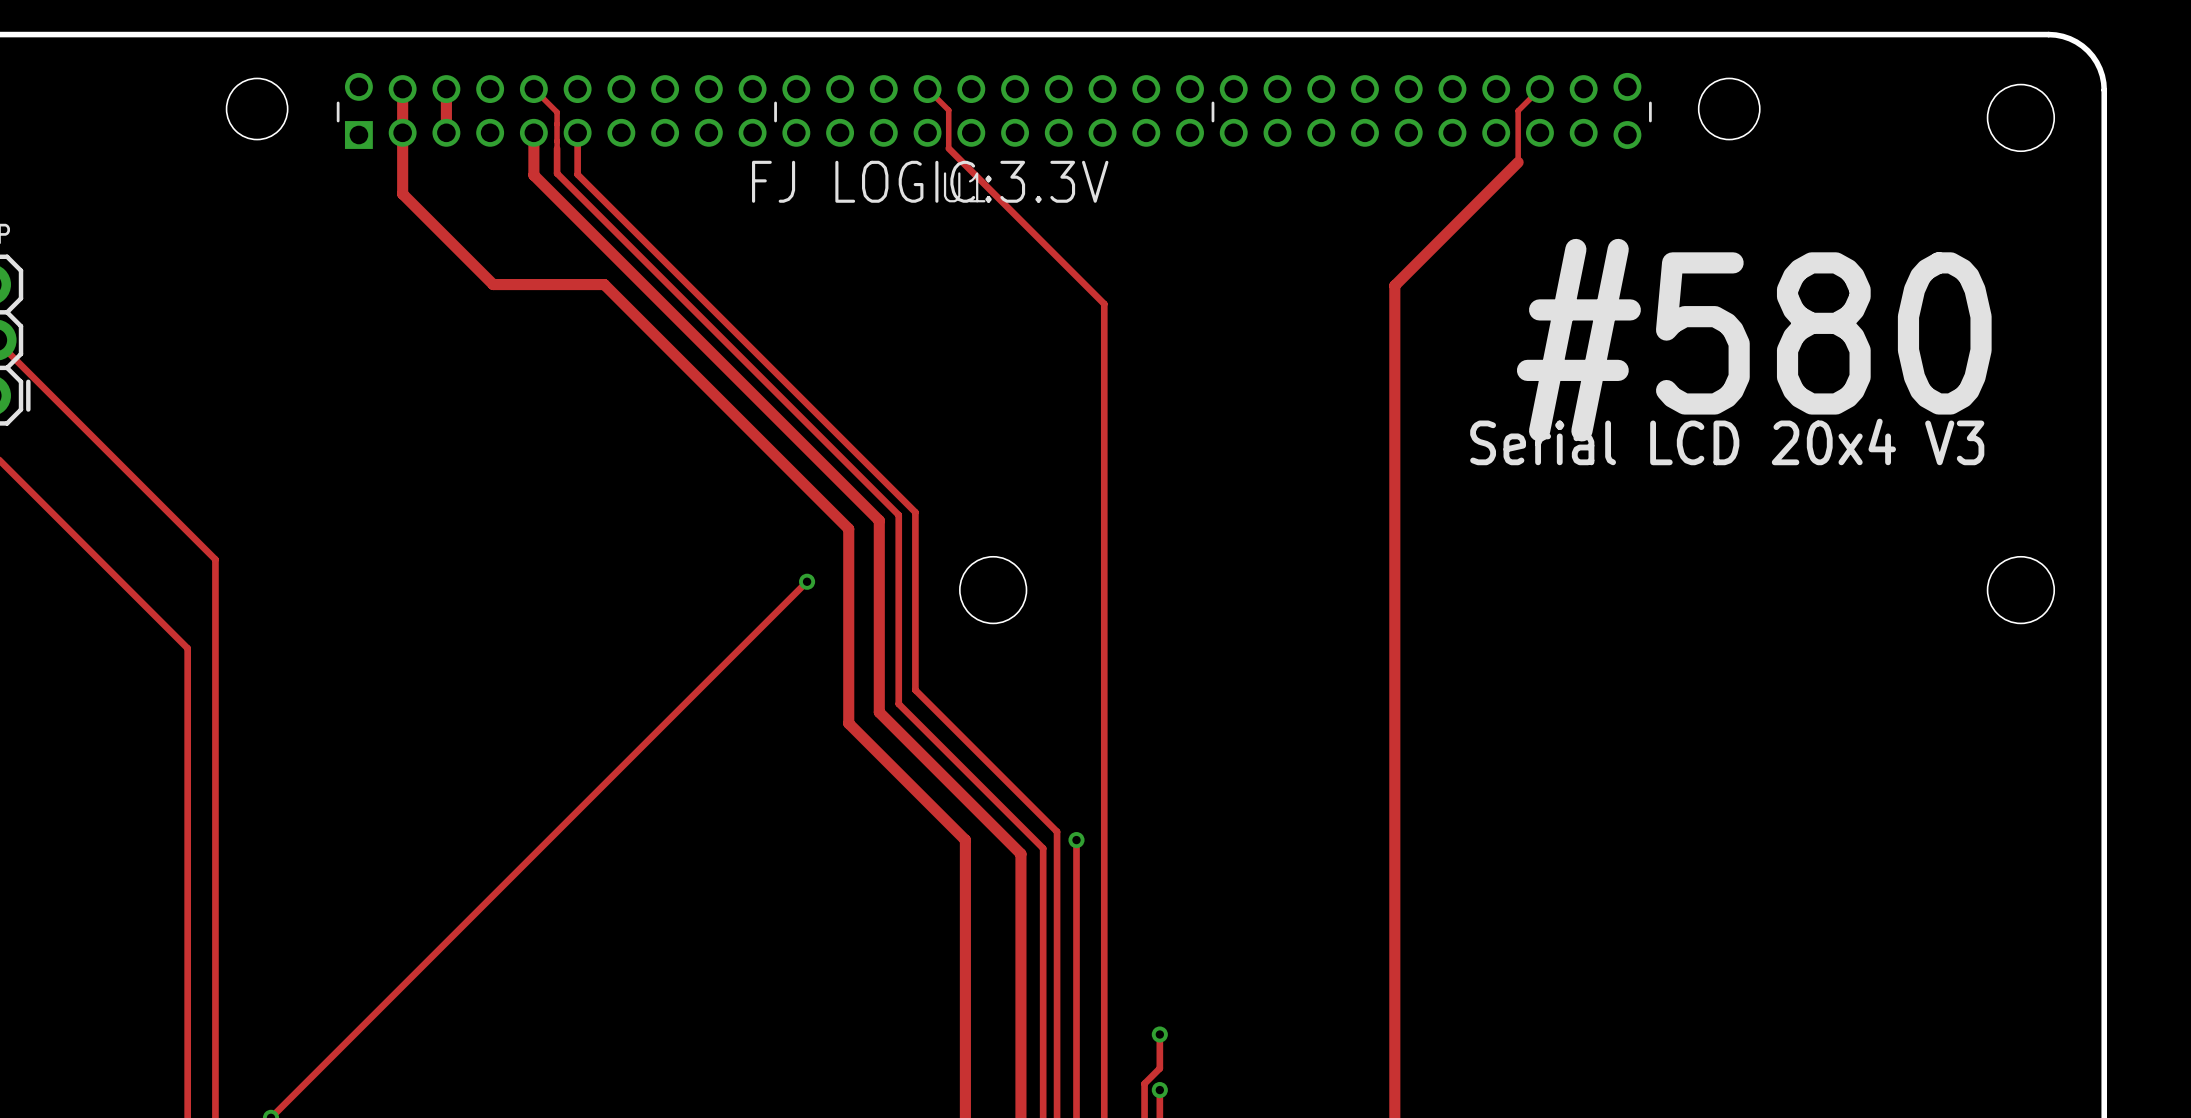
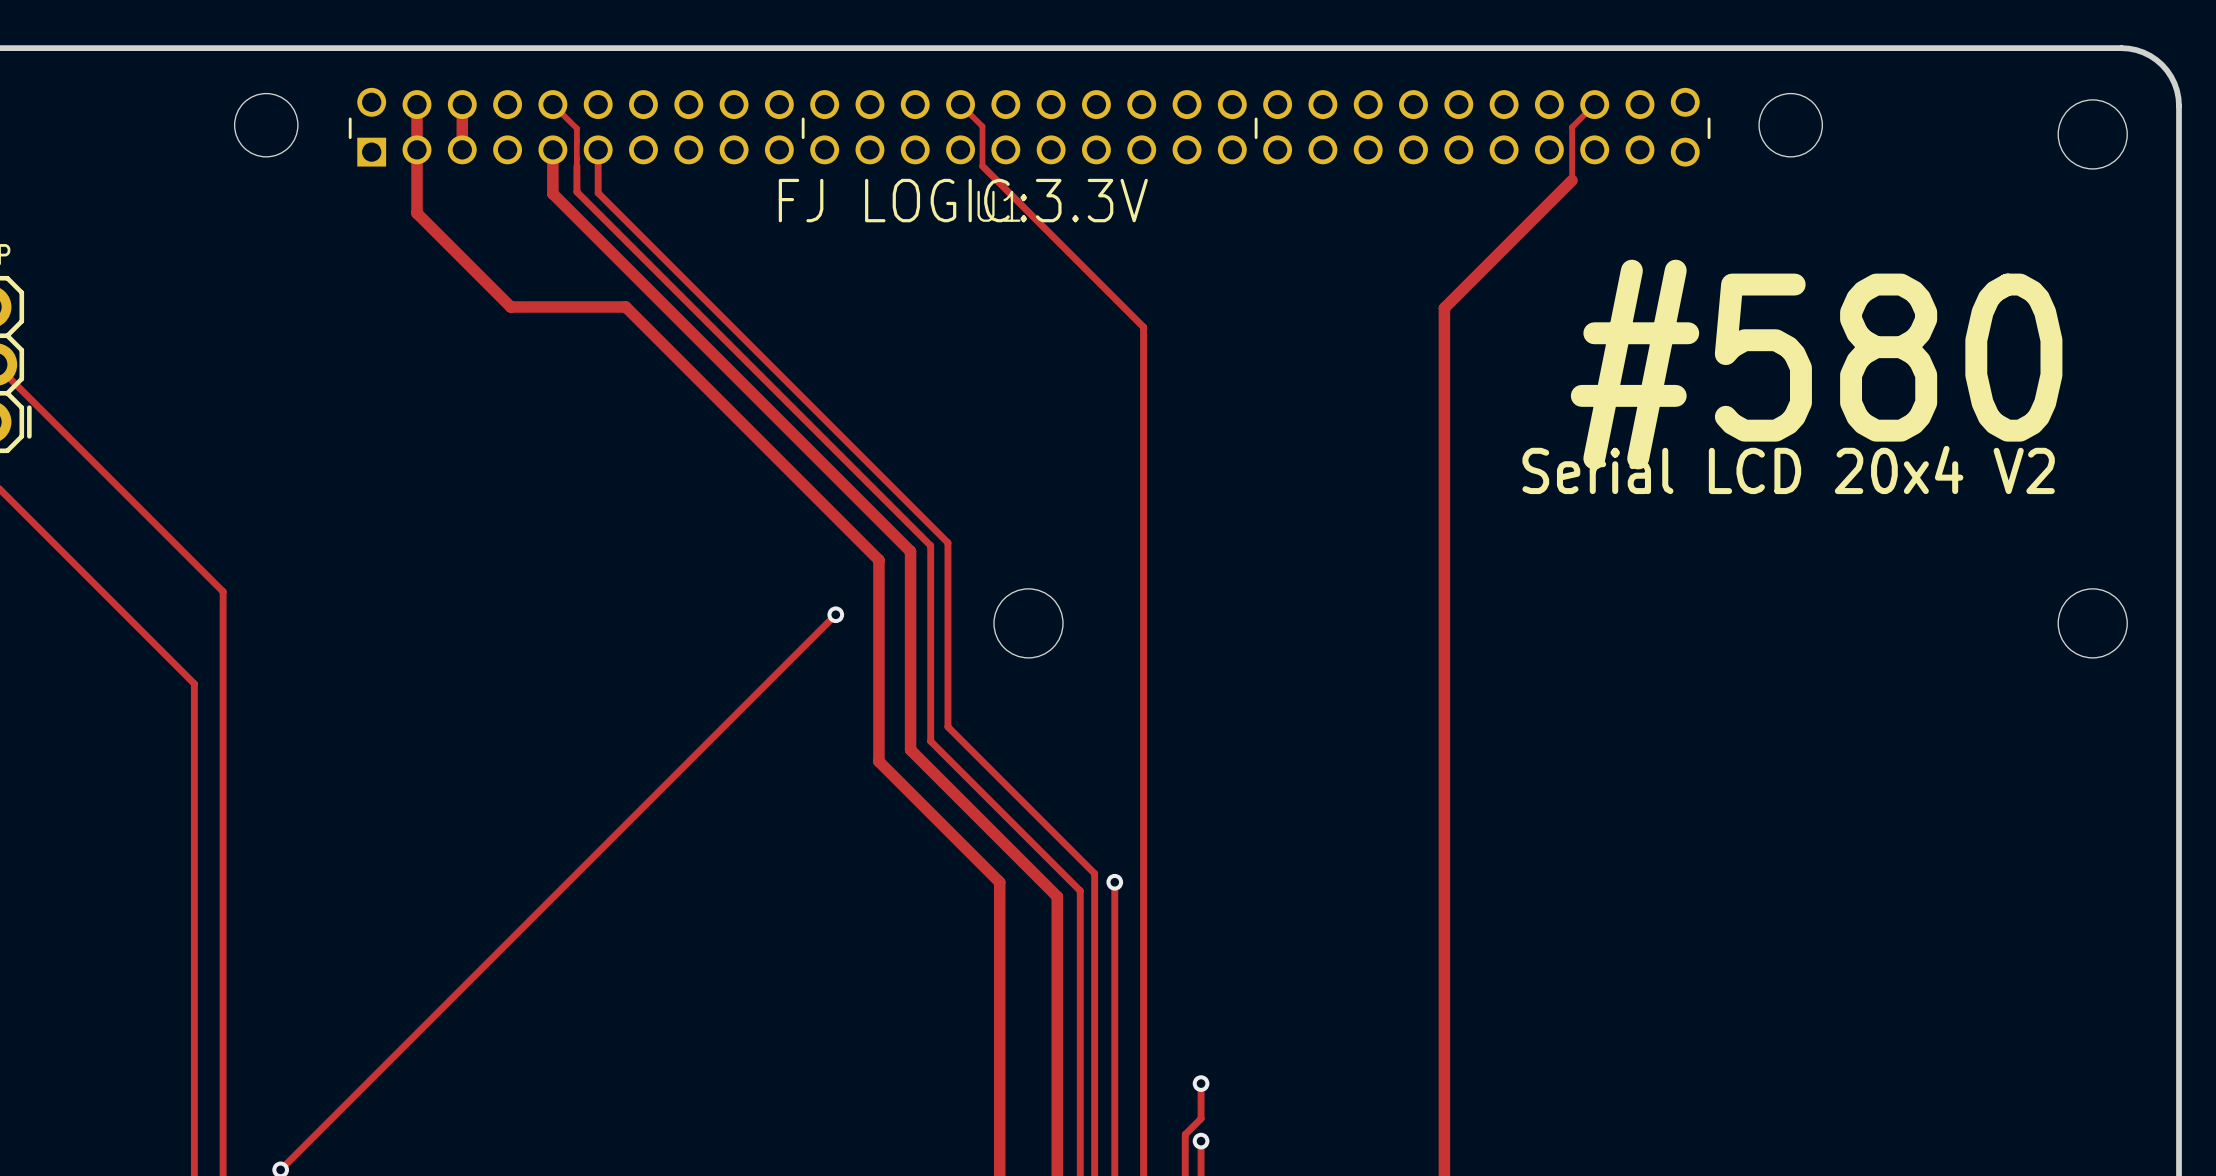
text: Serial LCD 20x4 V3 (1727, 441) -> Serial LCD 20x4 V2 (1788, 469)

